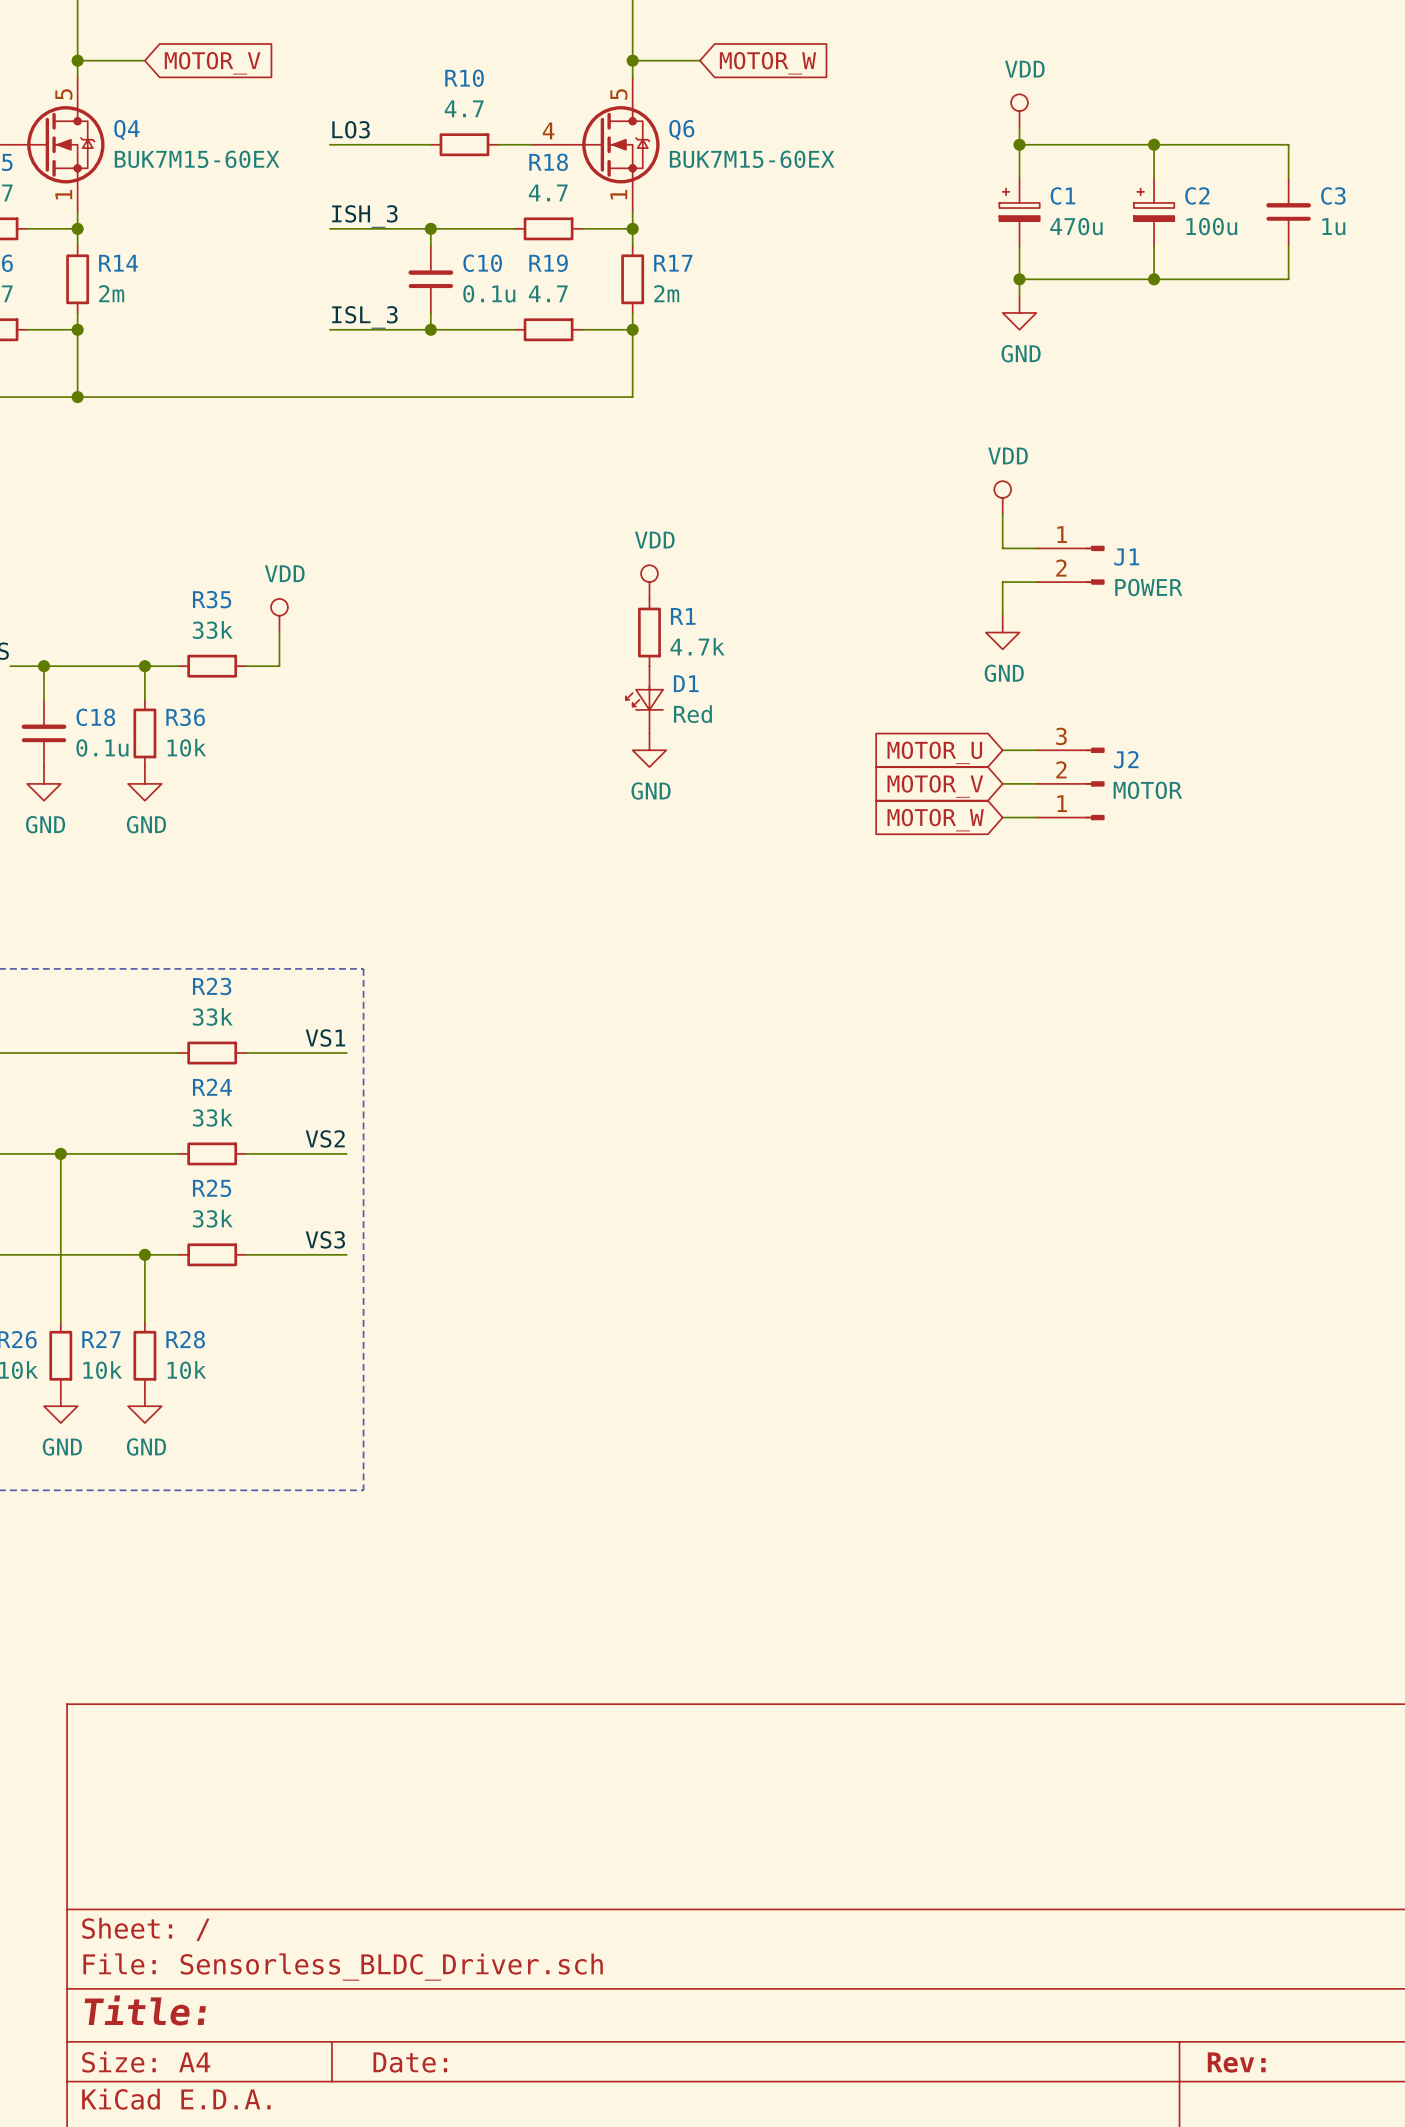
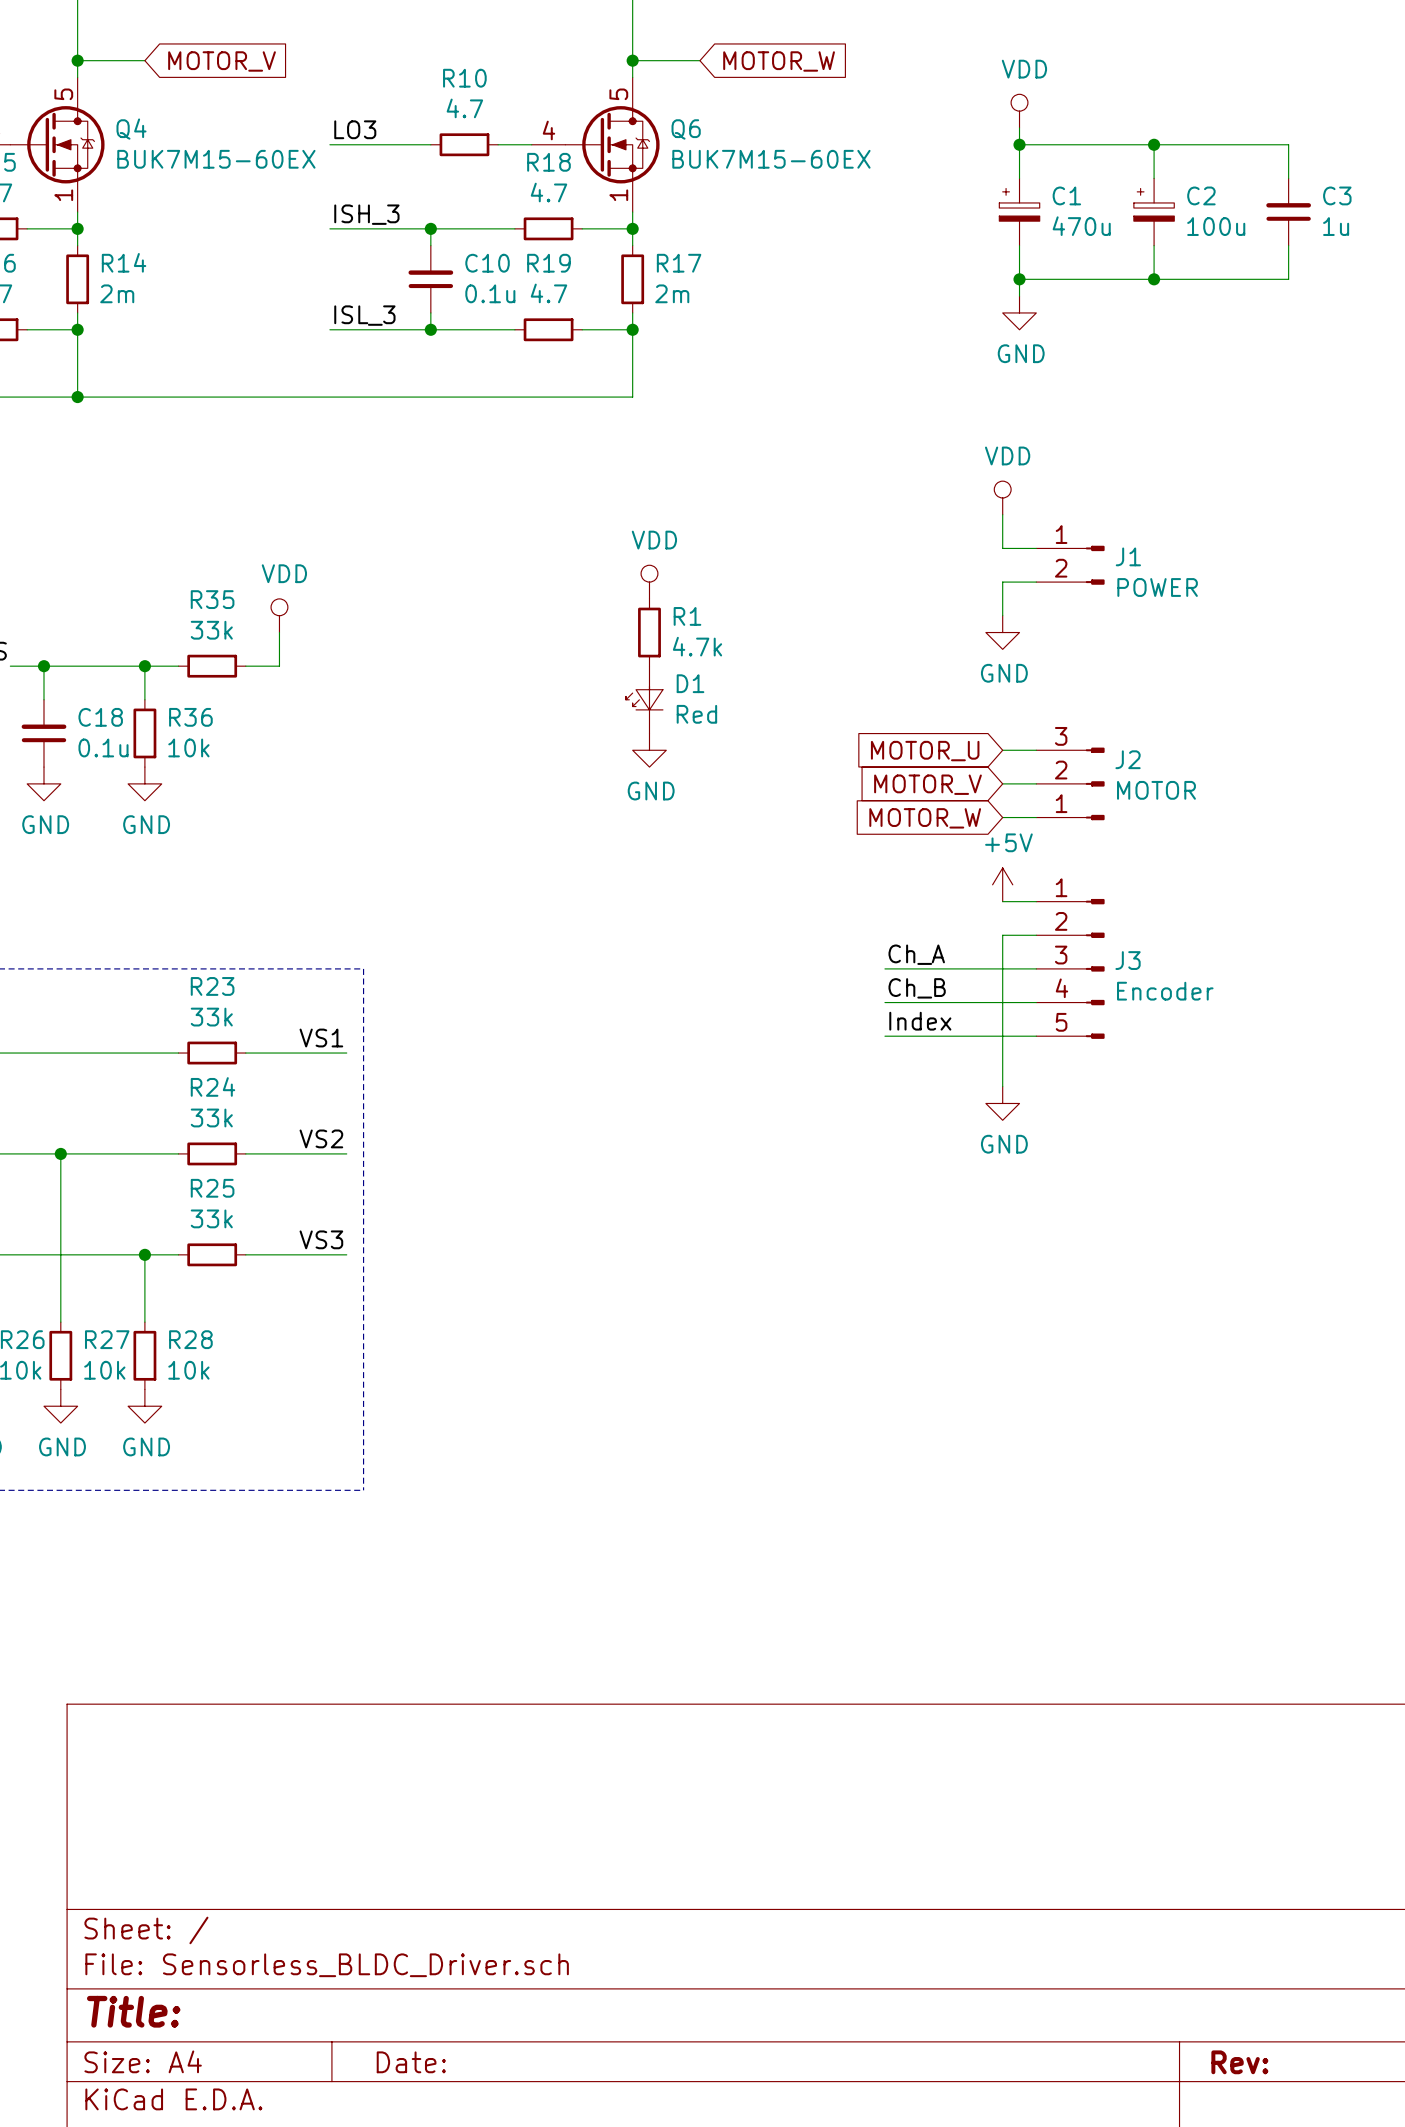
power symbol: none -> +5V (1002, 884)
wire: none -> (1002, 901) (1036, 901)
wire: none -> (1036, 935) (1002, 935) (1002, 1086)
label: none -> Ch_A (916, 954)
wire: none -> (884, 968) (1036, 968)
J3: none -> Encoder (1070, 968)
label: none -> Ch_B (917, 988)
wire: none -> (884, 1002) (1036, 1002)
label: none -> Index (920, 1021)
wire: none -> (884, 1036) (1036, 1036)
power symbol: none -> GND (1002, 1103)

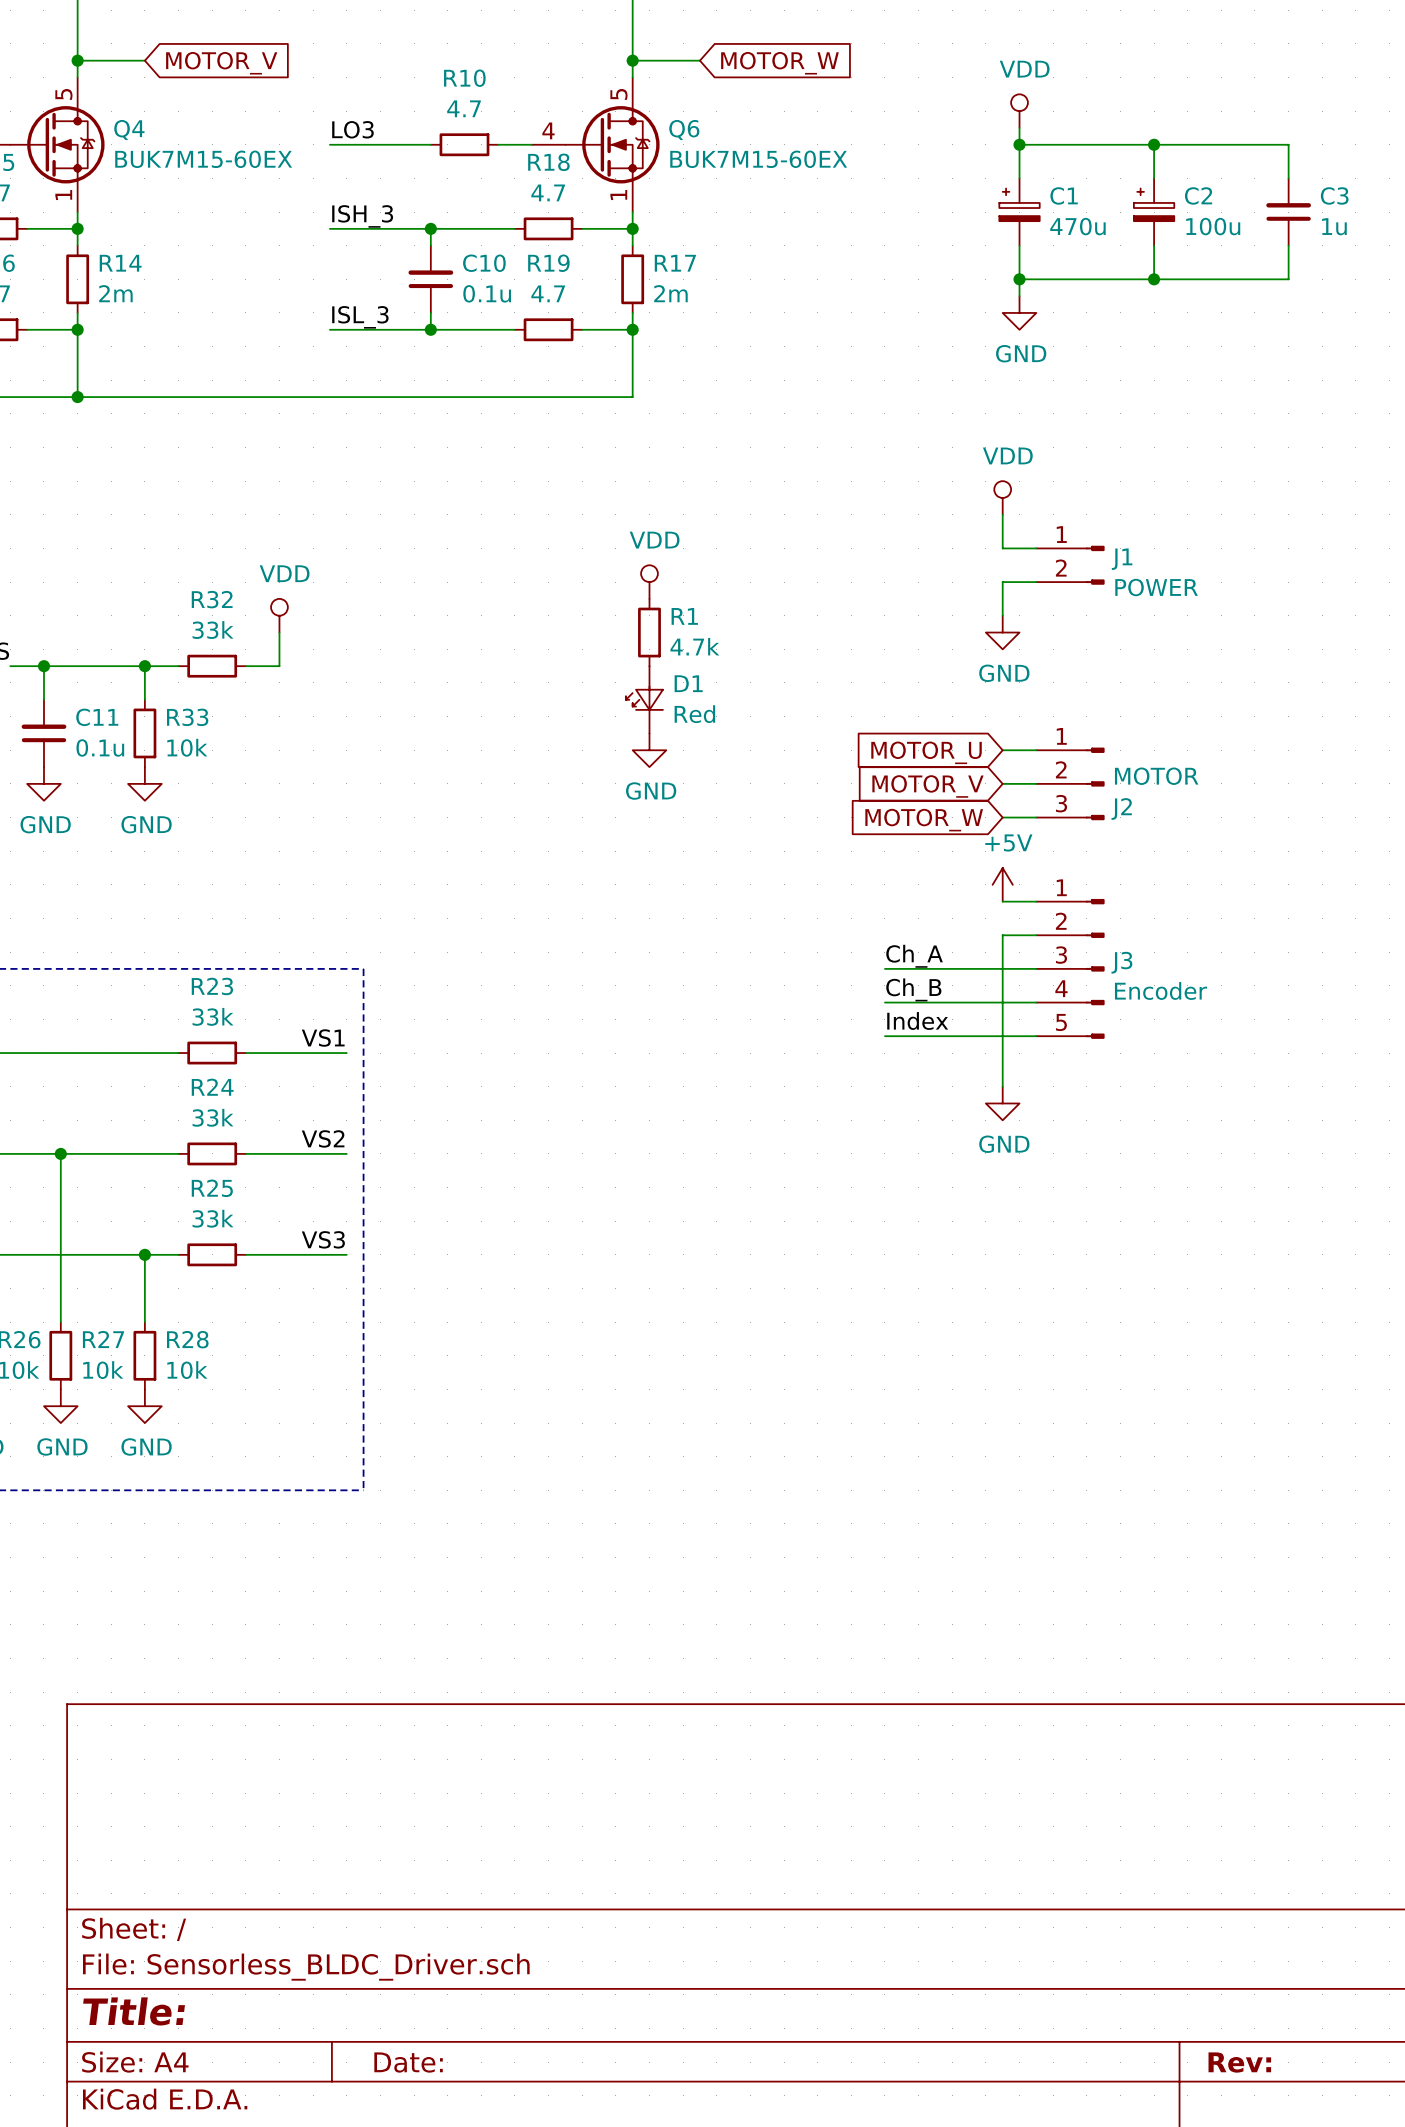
R35 name: R35 (212, 599) -> R32 (212, 599)
C18 name: C18 (100, 717) -> C11 (97, 717)
R36 name: R36 (190, 717) -> R33 (187, 717)
J2 flip: as is (1095, 783) -> up-down (1095, 783)

